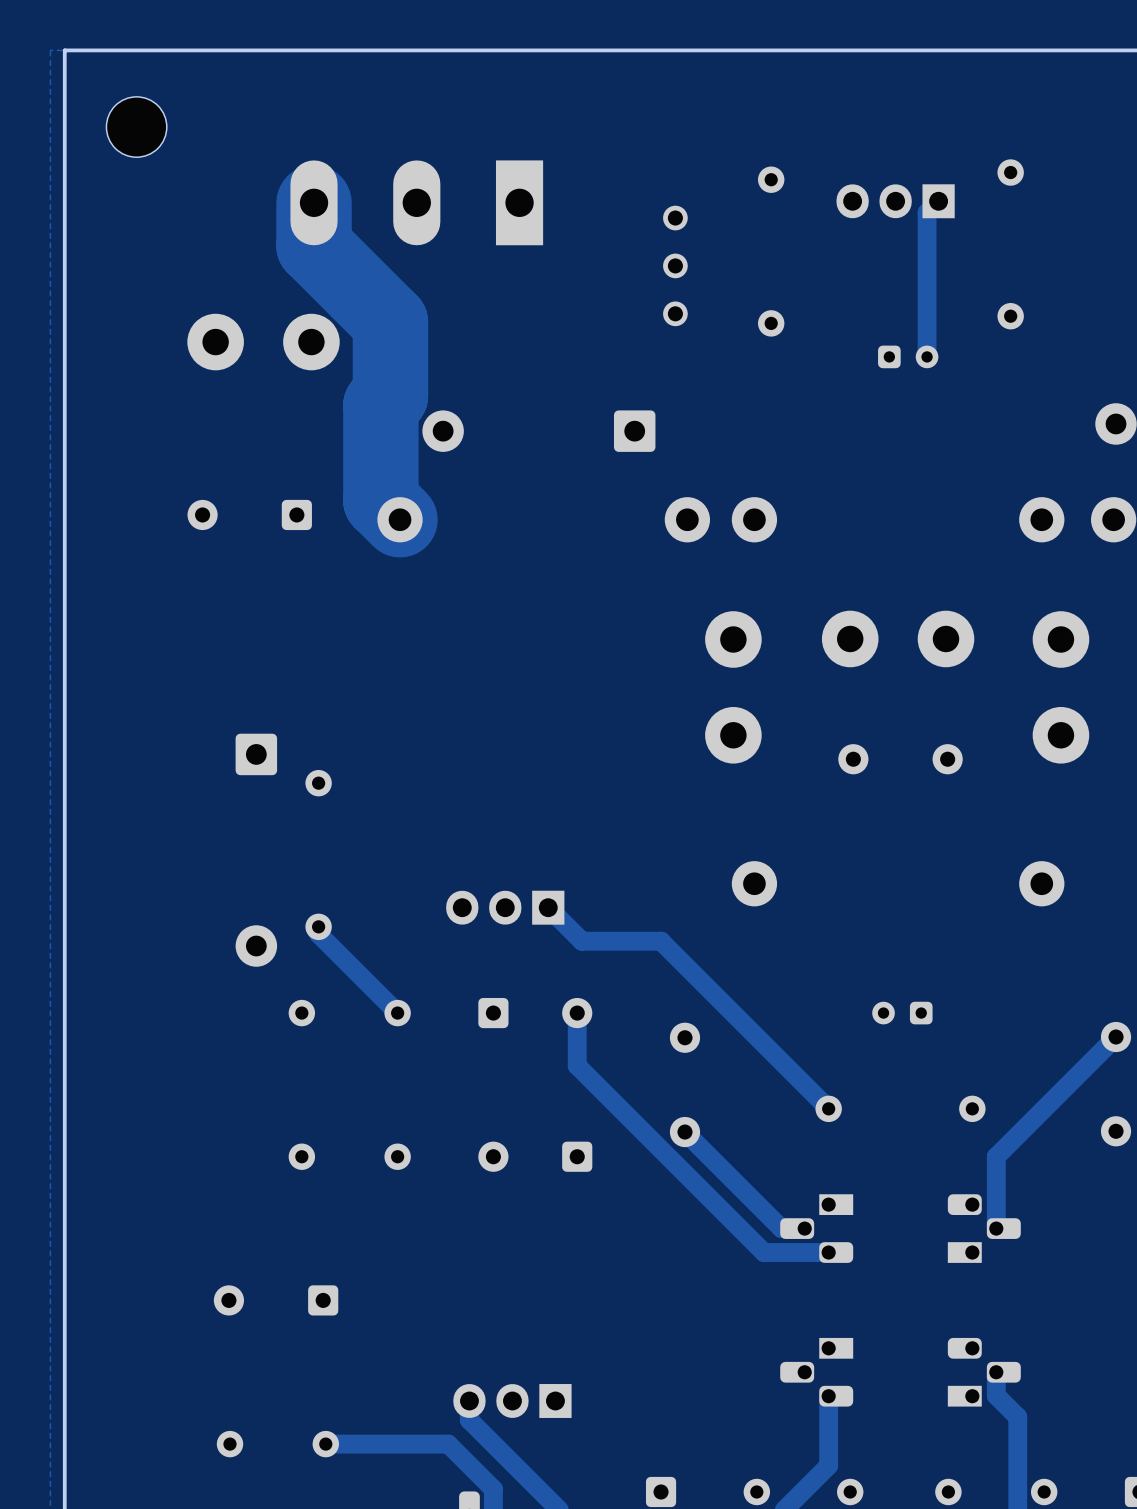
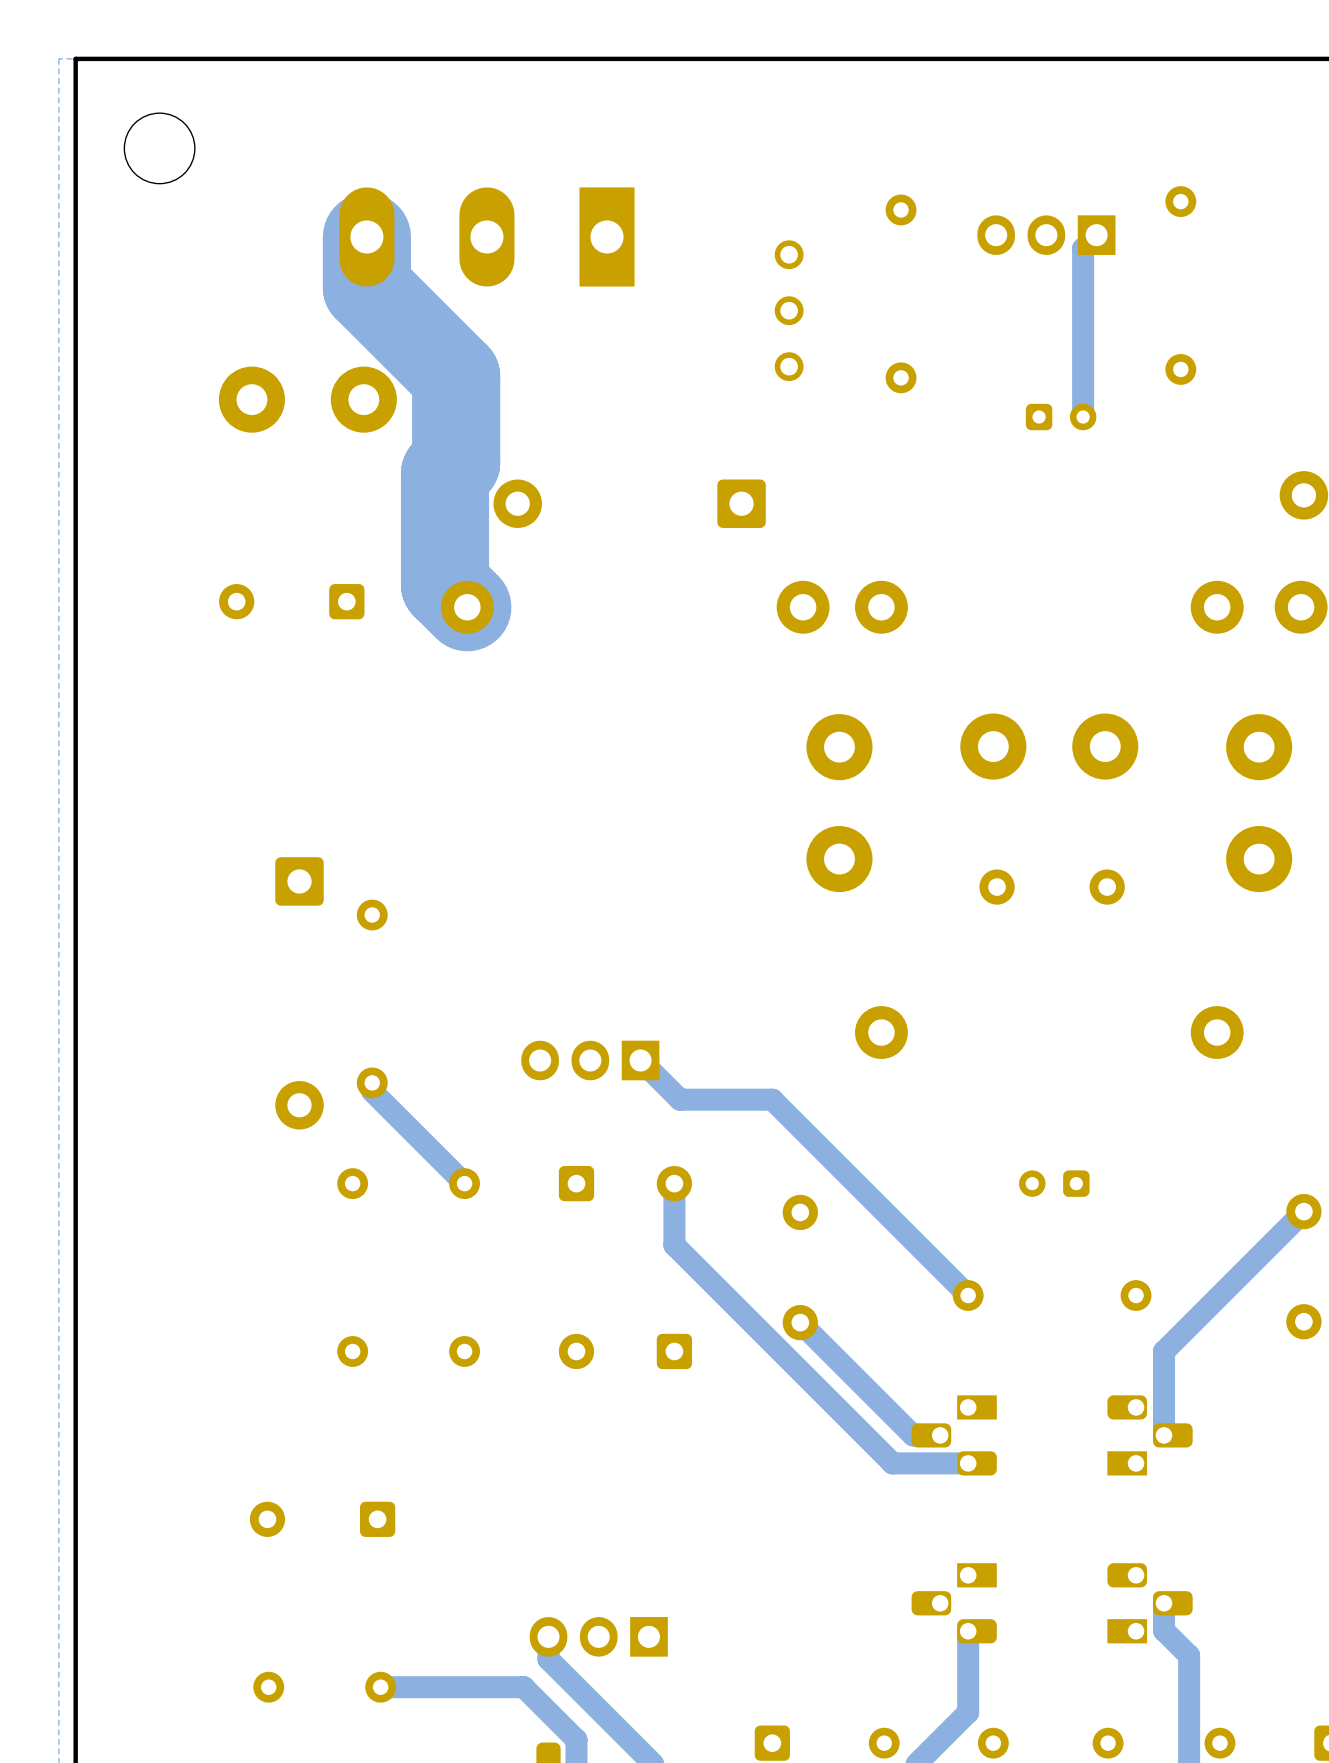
part position: (733, 687) -> (839, 803)
part position: (1060, 687) -> (1259, 803)

